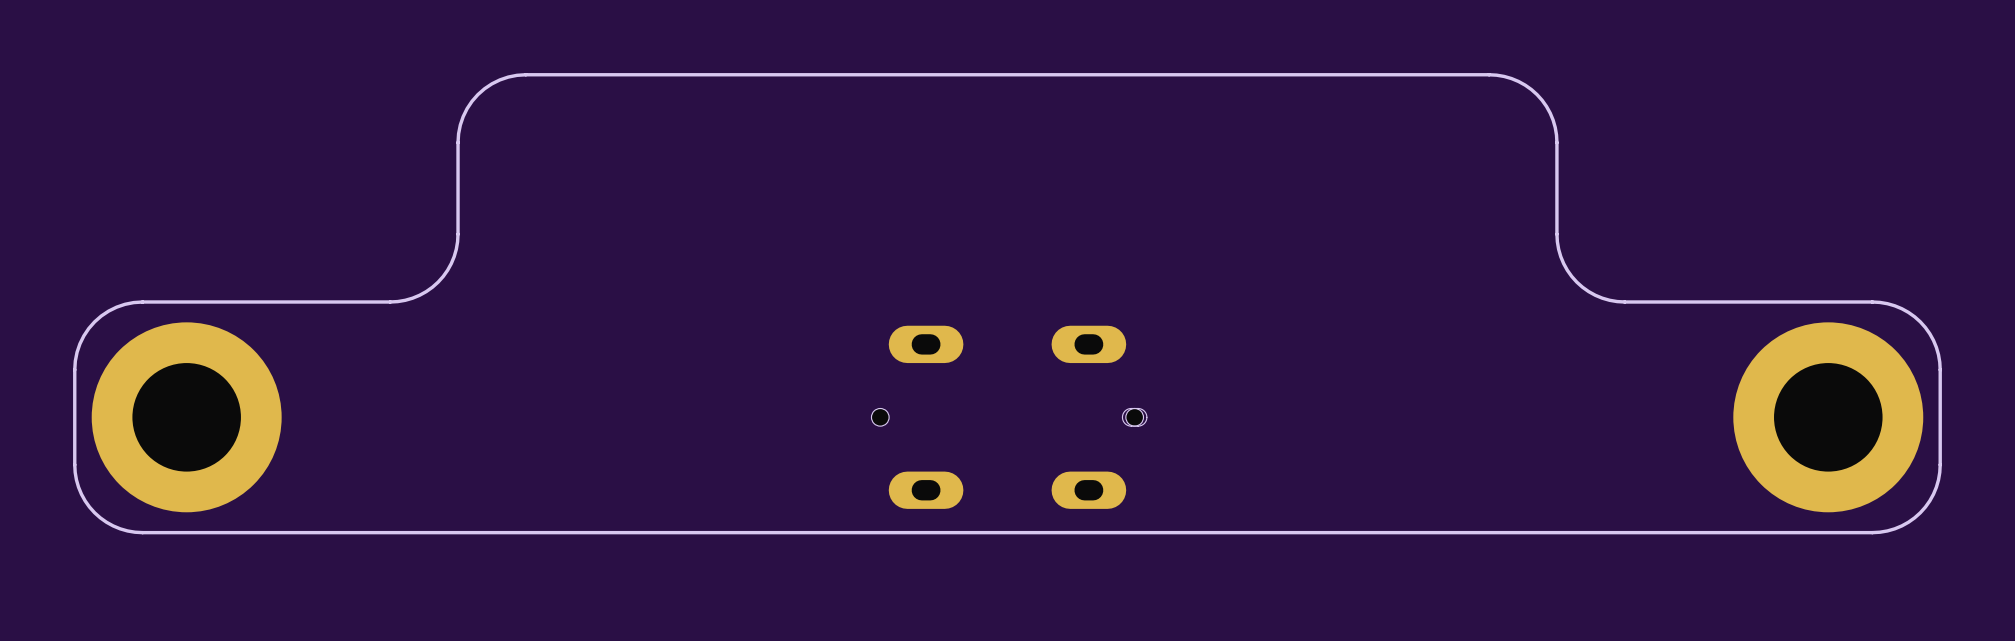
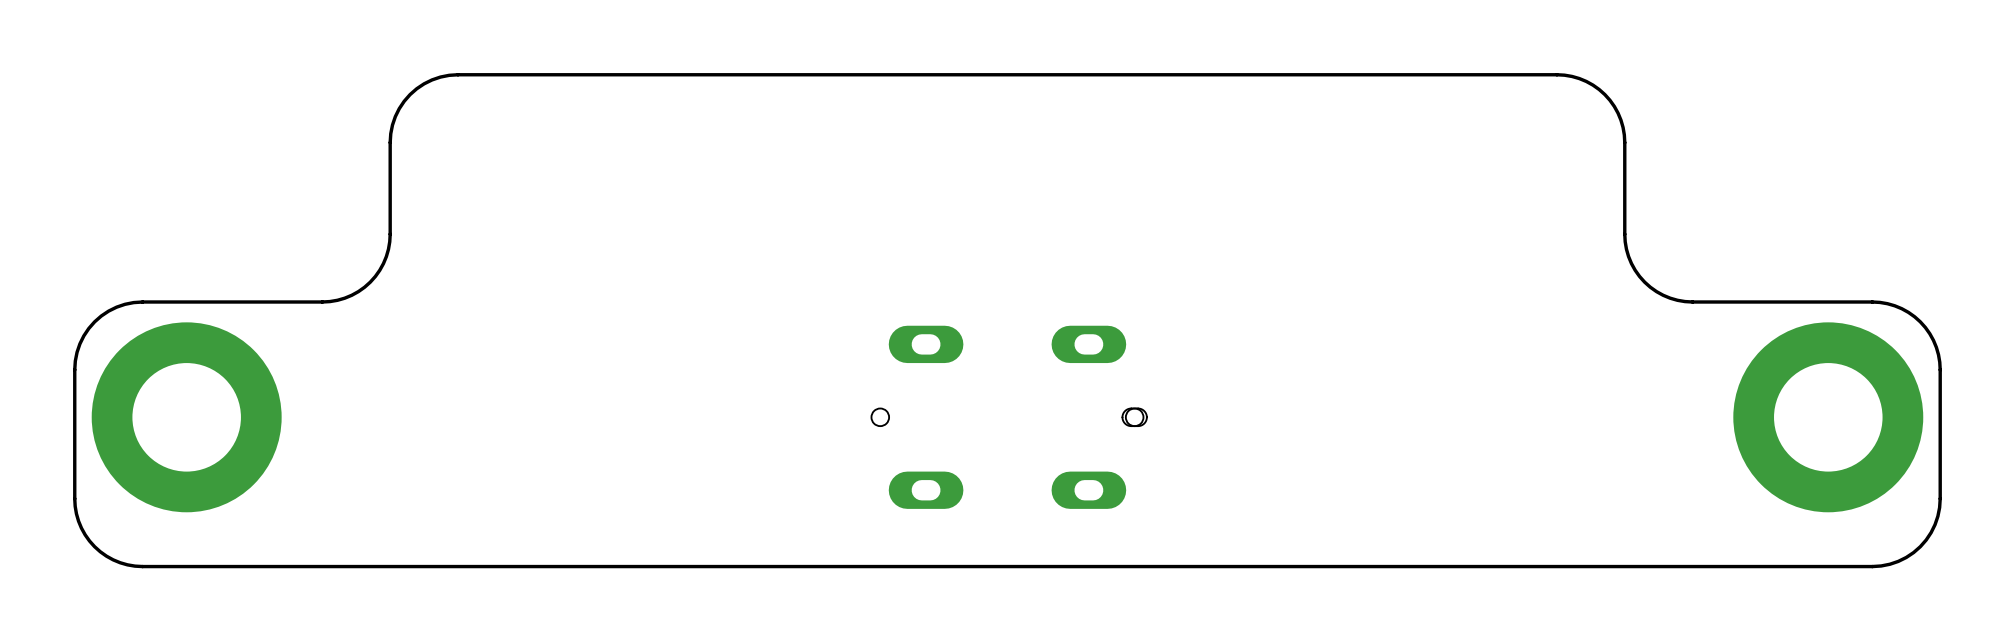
board edge: (525, 74) (508, 77) (491, 83) (472, 101) (463, 116) (458, 142) (457, 241) (451, 263) (438, 282) (419, 295) (405, 300) (322, 302) -> (525, 74) (449, 75) (432, 79) (410, 94) (395, 116) (390, 133) (389, 241) (383, 263) (370, 282) (358, 291) (337, 300) (322, 302)
board edge: (1489, 74) (1511, 78) (1525, 85) (1542, 100) (1550, 113) (1555, 127) (1556, 142) (1557, 241) (1563, 263) (1576, 282) (1595, 295) (1609, 300) (1692, 302) -> (1489, 74) (1572, 76) (1593, 85) (1604, 94) (1618, 113) (1624, 134) (1624, 234) (1626, 249) (1631, 263) (1644, 282) (1656, 291) (1677, 300) (1692, 302)
board edge: (1940, 464) (1936, 487) (1929, 500) (1920, 512) (1901, 525) (1887, 530) (1872, 532) (142, 532) (127, 530) (113, 525) (94, 512) (85, 500) (78, 487) (74, 464) -> (1940, 464) (1939, 507) (1931, 532) (1920, 546) (1906, 557) (1889, 564) (1872, 566) (134, 566) (120, 562) (106, 556) (94, 546) (85, 534) (78, 521) (75, 506) (74, 464)

